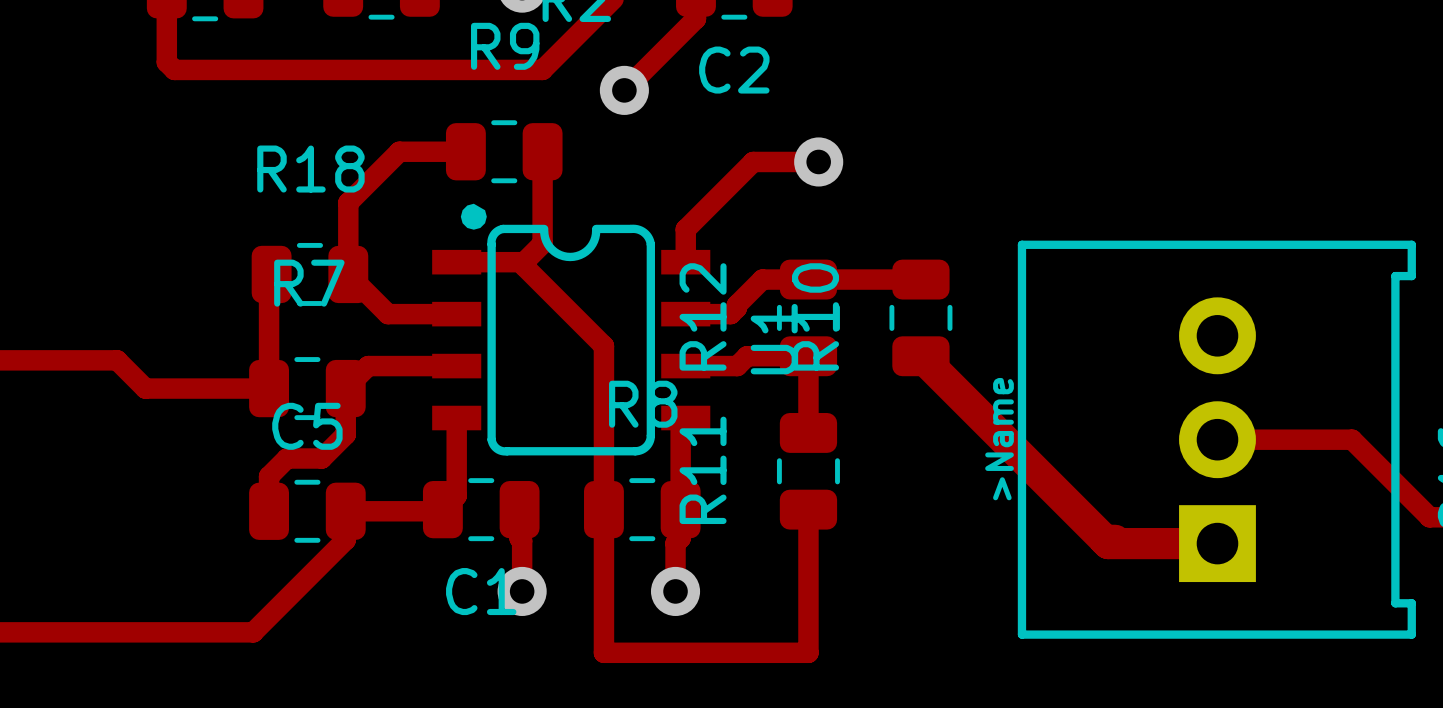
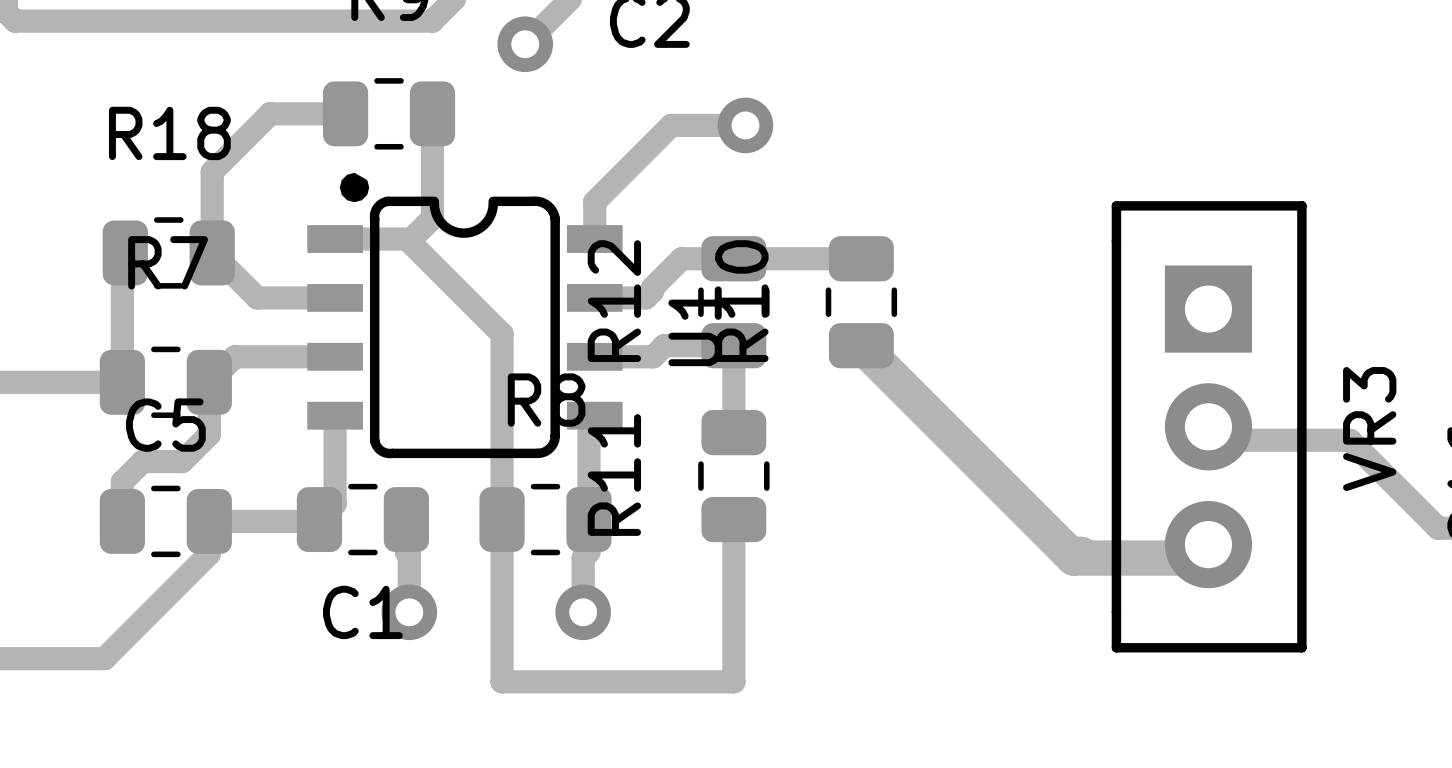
VR3: none -> (1209, 426)
part: (1216, 439) -> none

